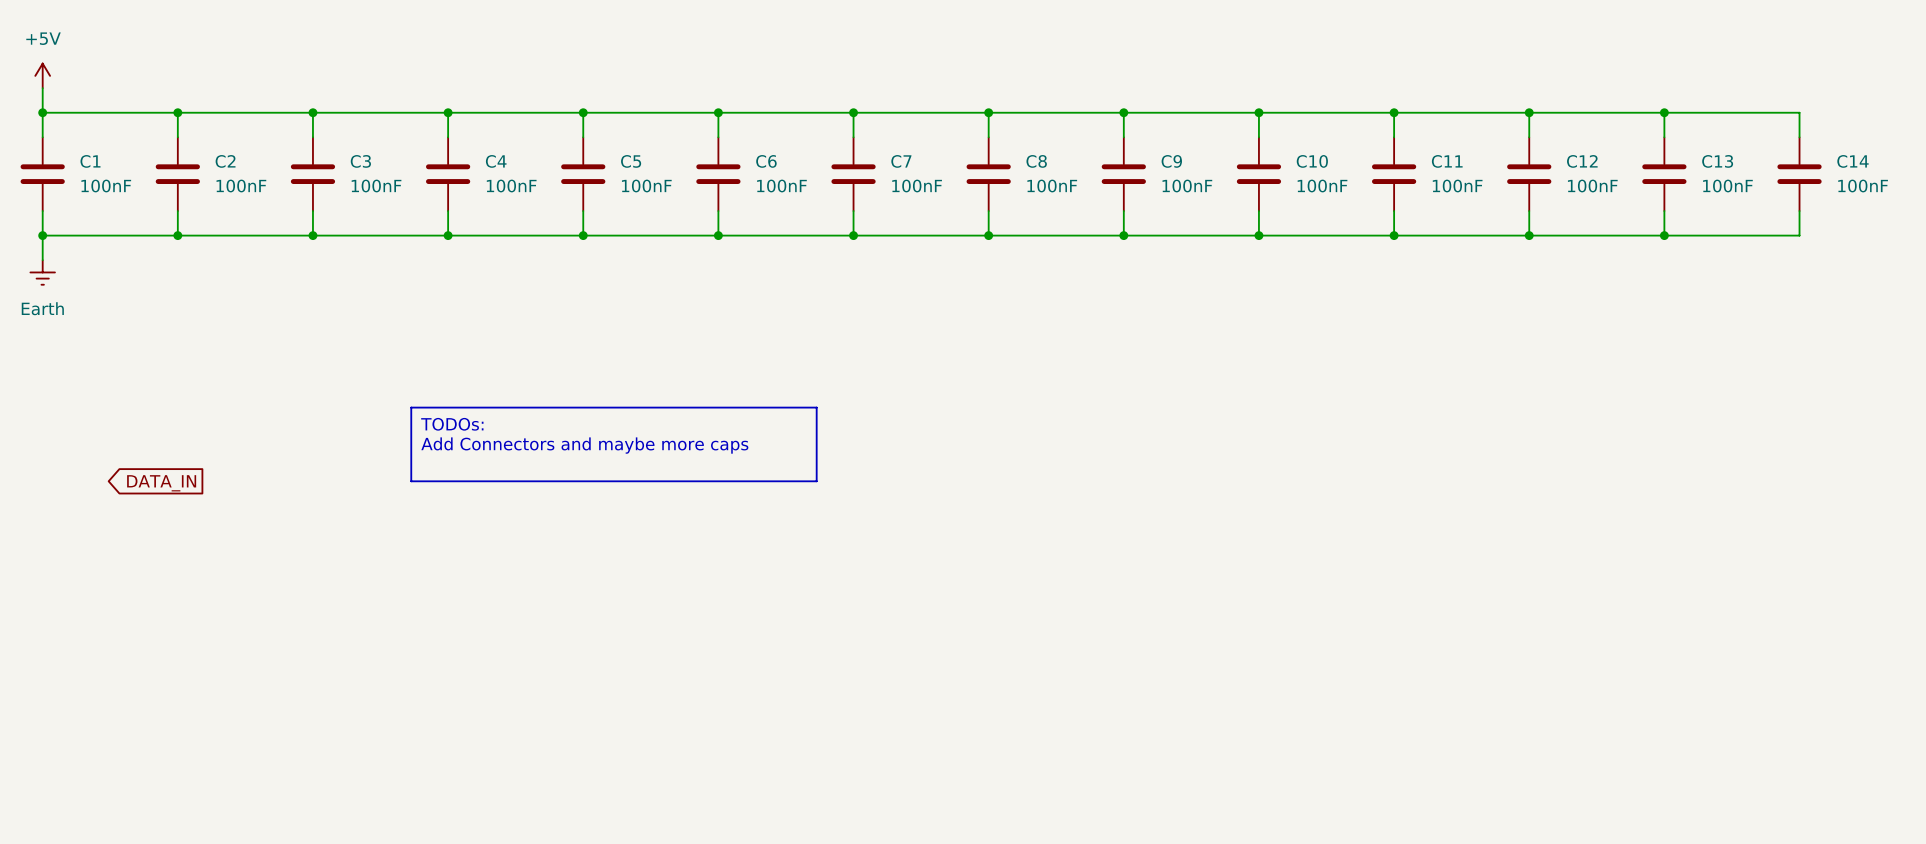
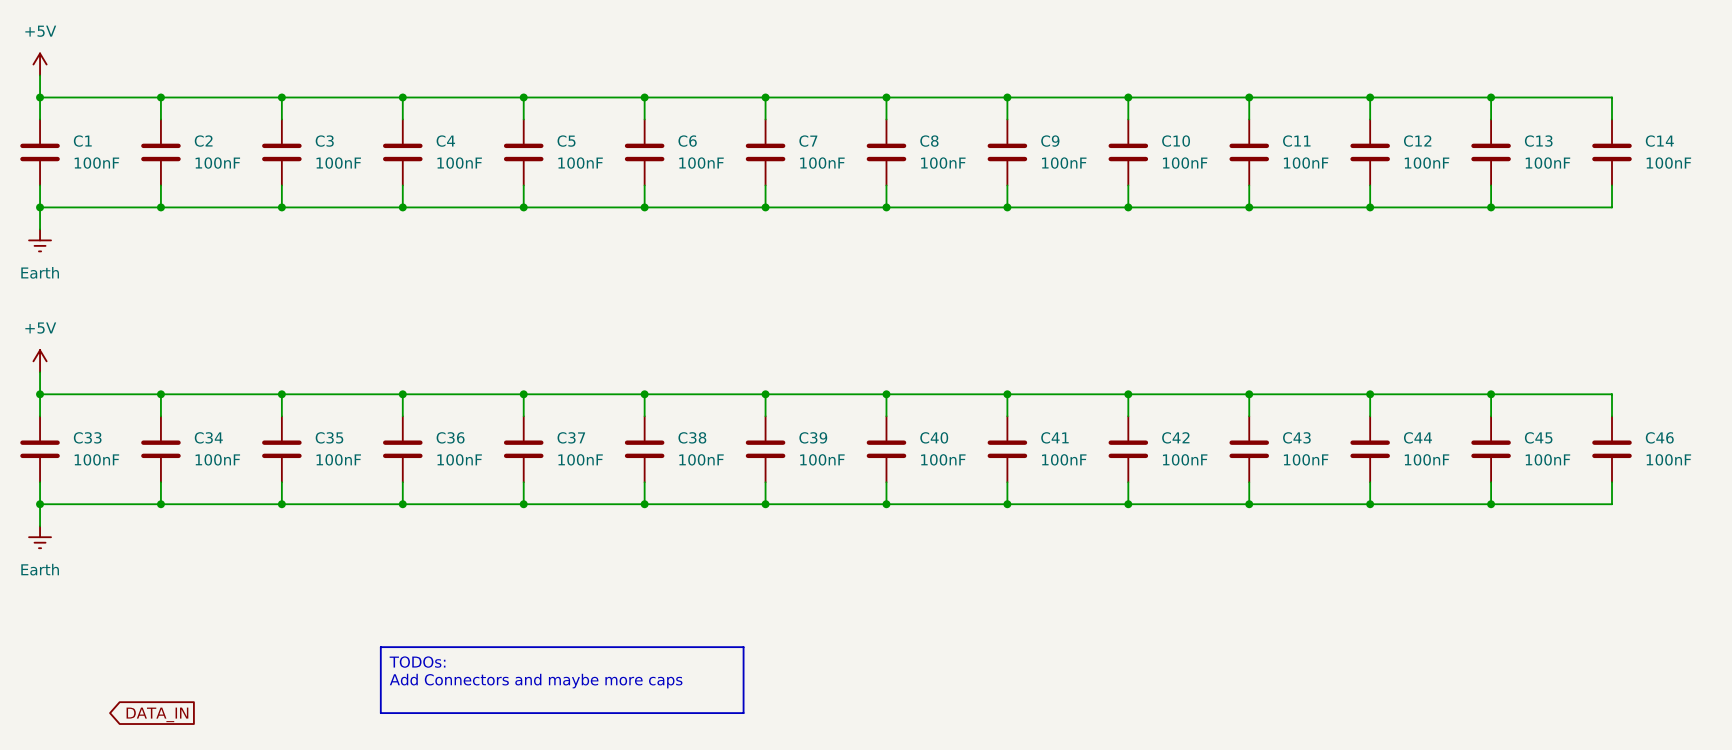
power symbol: none -> +5V (40, 361)
line: (411, 407) (816, 407) (816, 481) (411, 481) (411, 407) -> none
wire: none -> (40, 372) (40, 416)
text: TODOs: (452, 424) -> none
wire: none -> (40, 394) (1612, 394) (1612, 416)
junction: none -> (40, 394)
wire: none -> (160, 394) (160, 416)
junction: none -> (160, 394)
wire: none -> (281, 394) (281, 416)
junction: none -> (281, 394)
wire: none -> (402, 394) (402, 416)
junction: none -> (402, 394)
wire: none -> (523, 394) (523, 416)
junction: none -> (523, 394)
wire: none -> (644, 394) (644, 416)
junction: none -> (644, 394)
wire: none -> (765, 394) (765, 416)
junction: none -> (765, 394)
wire: none -> (886, 394) (886, 416)
junction: none -> (886, 394)
wire: none -> (1007, 394) (1007, 416)
junction: none -> (1007, 394)
wire: none -> (1128, 394) (1128, 416)
junction: none -> (1128, 394)
wire: none -> (1249, 394) (1249, 416)
junction: none -> (1249, 394)
wire: none -> (1370, 394) (1370, 416)
junction: none -> (1370, 394)
wire: none -> (1491, 394) (1491, 416)
junction: none -> (1491, 394)
text: Add Connectors and maybe more caps (584, 445) -> none
global label: DATA_IN (161, 483) -> none
C33: none -> 100nF (40, 449)
C34: none -> 100nF (160, 449)
C35: none -> 100nF (281, 449)
C36: none -> 100nF (402, 449)
C37: none -> 100nF (523, 449)
C38: none -> 100nF (644, 449)
C39: none -> 100nF (765, 449)
C40: none -> 100nF (886, 449)
C41: none -> 100nF (1007, 449)
C42: none -> 100nF (1128, 449)
C43: none -> 100nF (1249, 449)
C44: none -> 100nF (1370, 449)
C45: none -> 100nF (1491, 449)
C46: none -> 100nF (1612, 449)
wire: none -> (40, 482) (40, 526)
wire: none -> (160, 482) (160, 504)
wire: none -> (281, 482) (281, 504)
wire: none -> (402, 482) (402, 504)
wire: none -> (523, 482) (523, 504)
wire: none -> (644, 482) (644, 504)
wire: none -> (765, 482) (765, 504)
wire: none -> (886, 482) (886, 504)
wire: none -> (1007, 482) (1007, 504)
wire: none -> (1128, 482) (1128, 504)
wire: none -> (1249, 482) (1249, 504)
wire: none -> (1370, 482) (1370, 504)
wire: none -> (1491, 482) (1491, 504)
wire: none -> (1612, 482) (1612, 504) (40, 504)
junction: none -> (40, 504)
junction: none -> (160, 504)
junction: none -> (281, 504)
junction: none -> (402, 504)
junction: none -> (523, 504)
junction: none -> (644, 504)
junction: none -> (765, 504)
junction: none -> (886, 504)
junction: none -> (1007, 504)
junction: none -> (1128, 504)
junction: none -> (1249, 504)
junction: none -> (1370, 504)
junction: none -> (1491, 504)
power symbol: none -> Earth (40, 537)
line: none -> (380, 647) (743, 647) (743, 713) (380, 713) (380, 647)
text: none -> TODOs: (417, 662)
text: none -> Add Connectors and maybe more caps (536, 681)
global label: none -> DATA_IN (157, 714)

